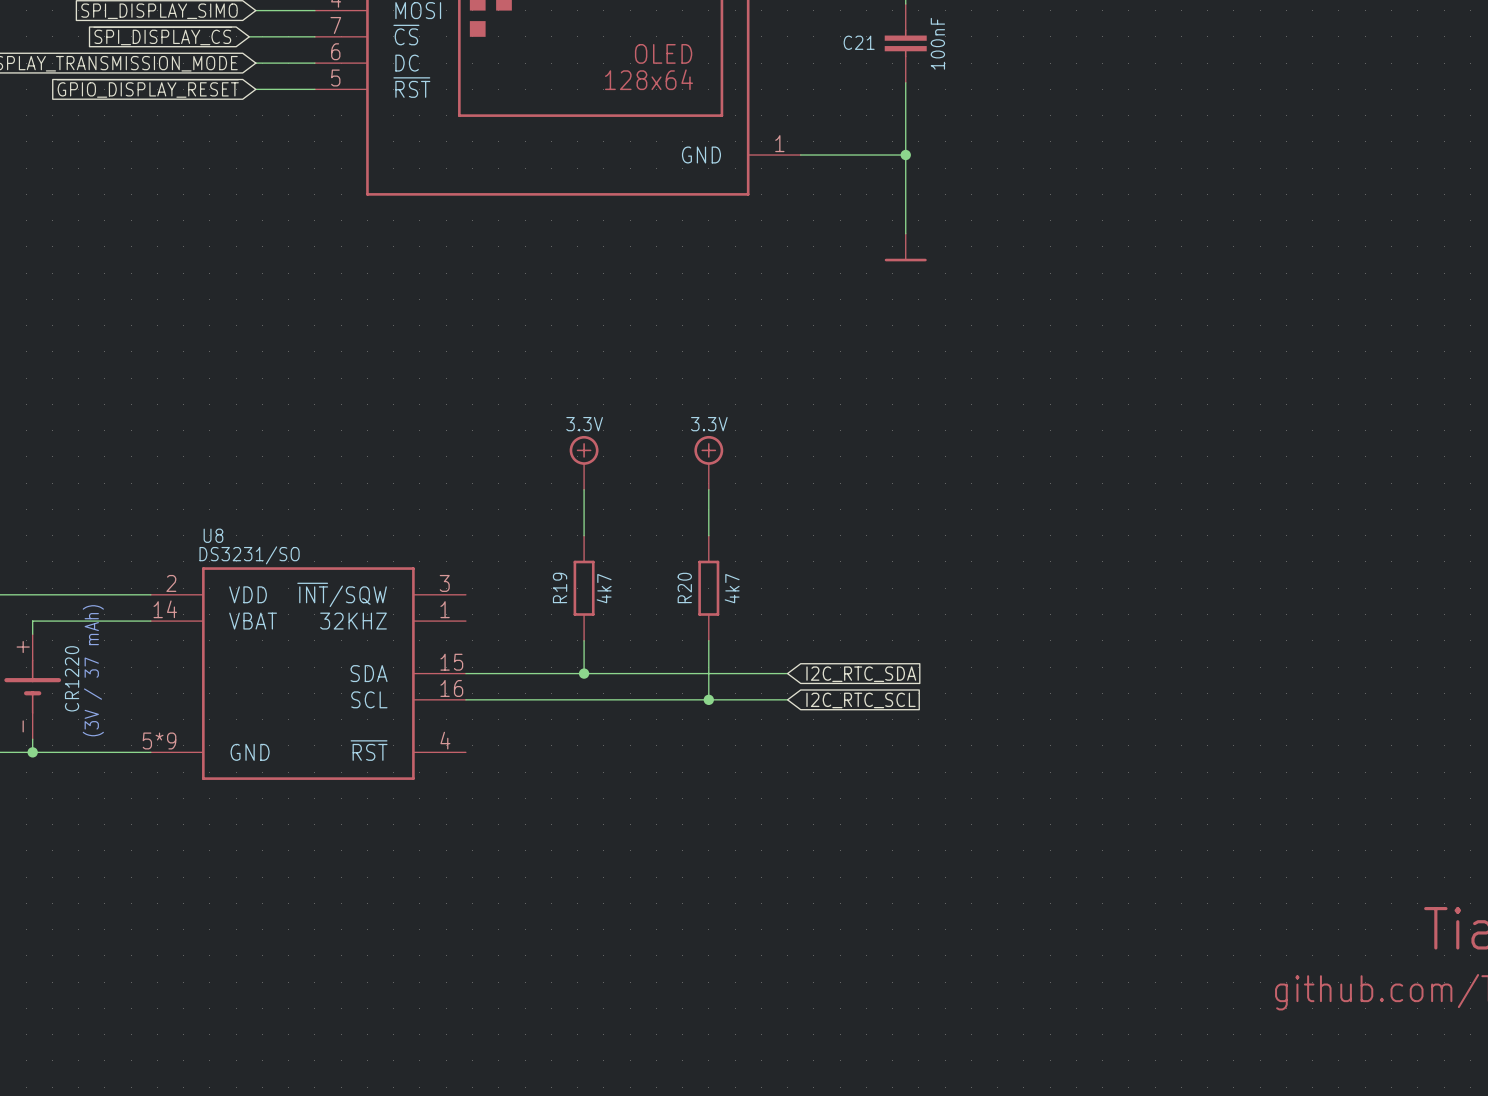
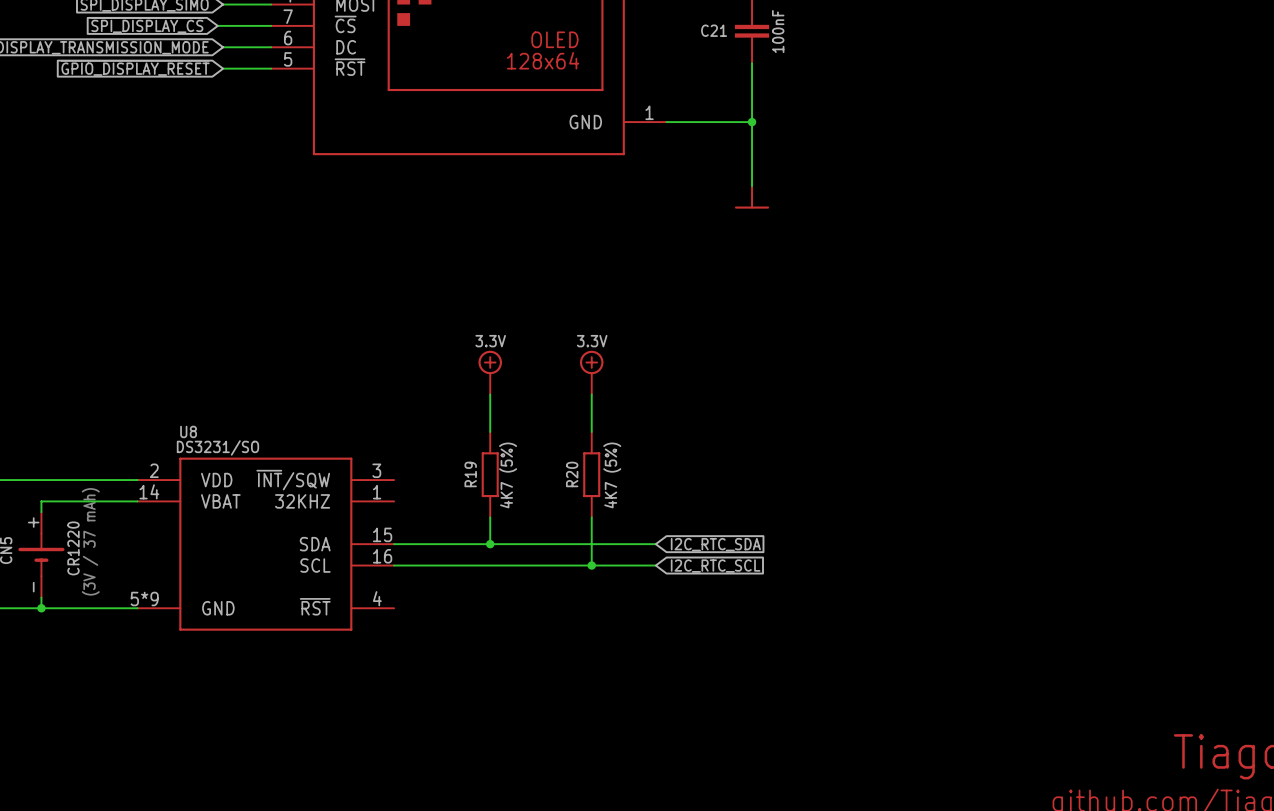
R19 value: 4k7 (604, 588) -> 4K7 (5%) (508, 475)
R20 value: 4k7 (732, 588) -> 4K7 (5%) (612, 475)

